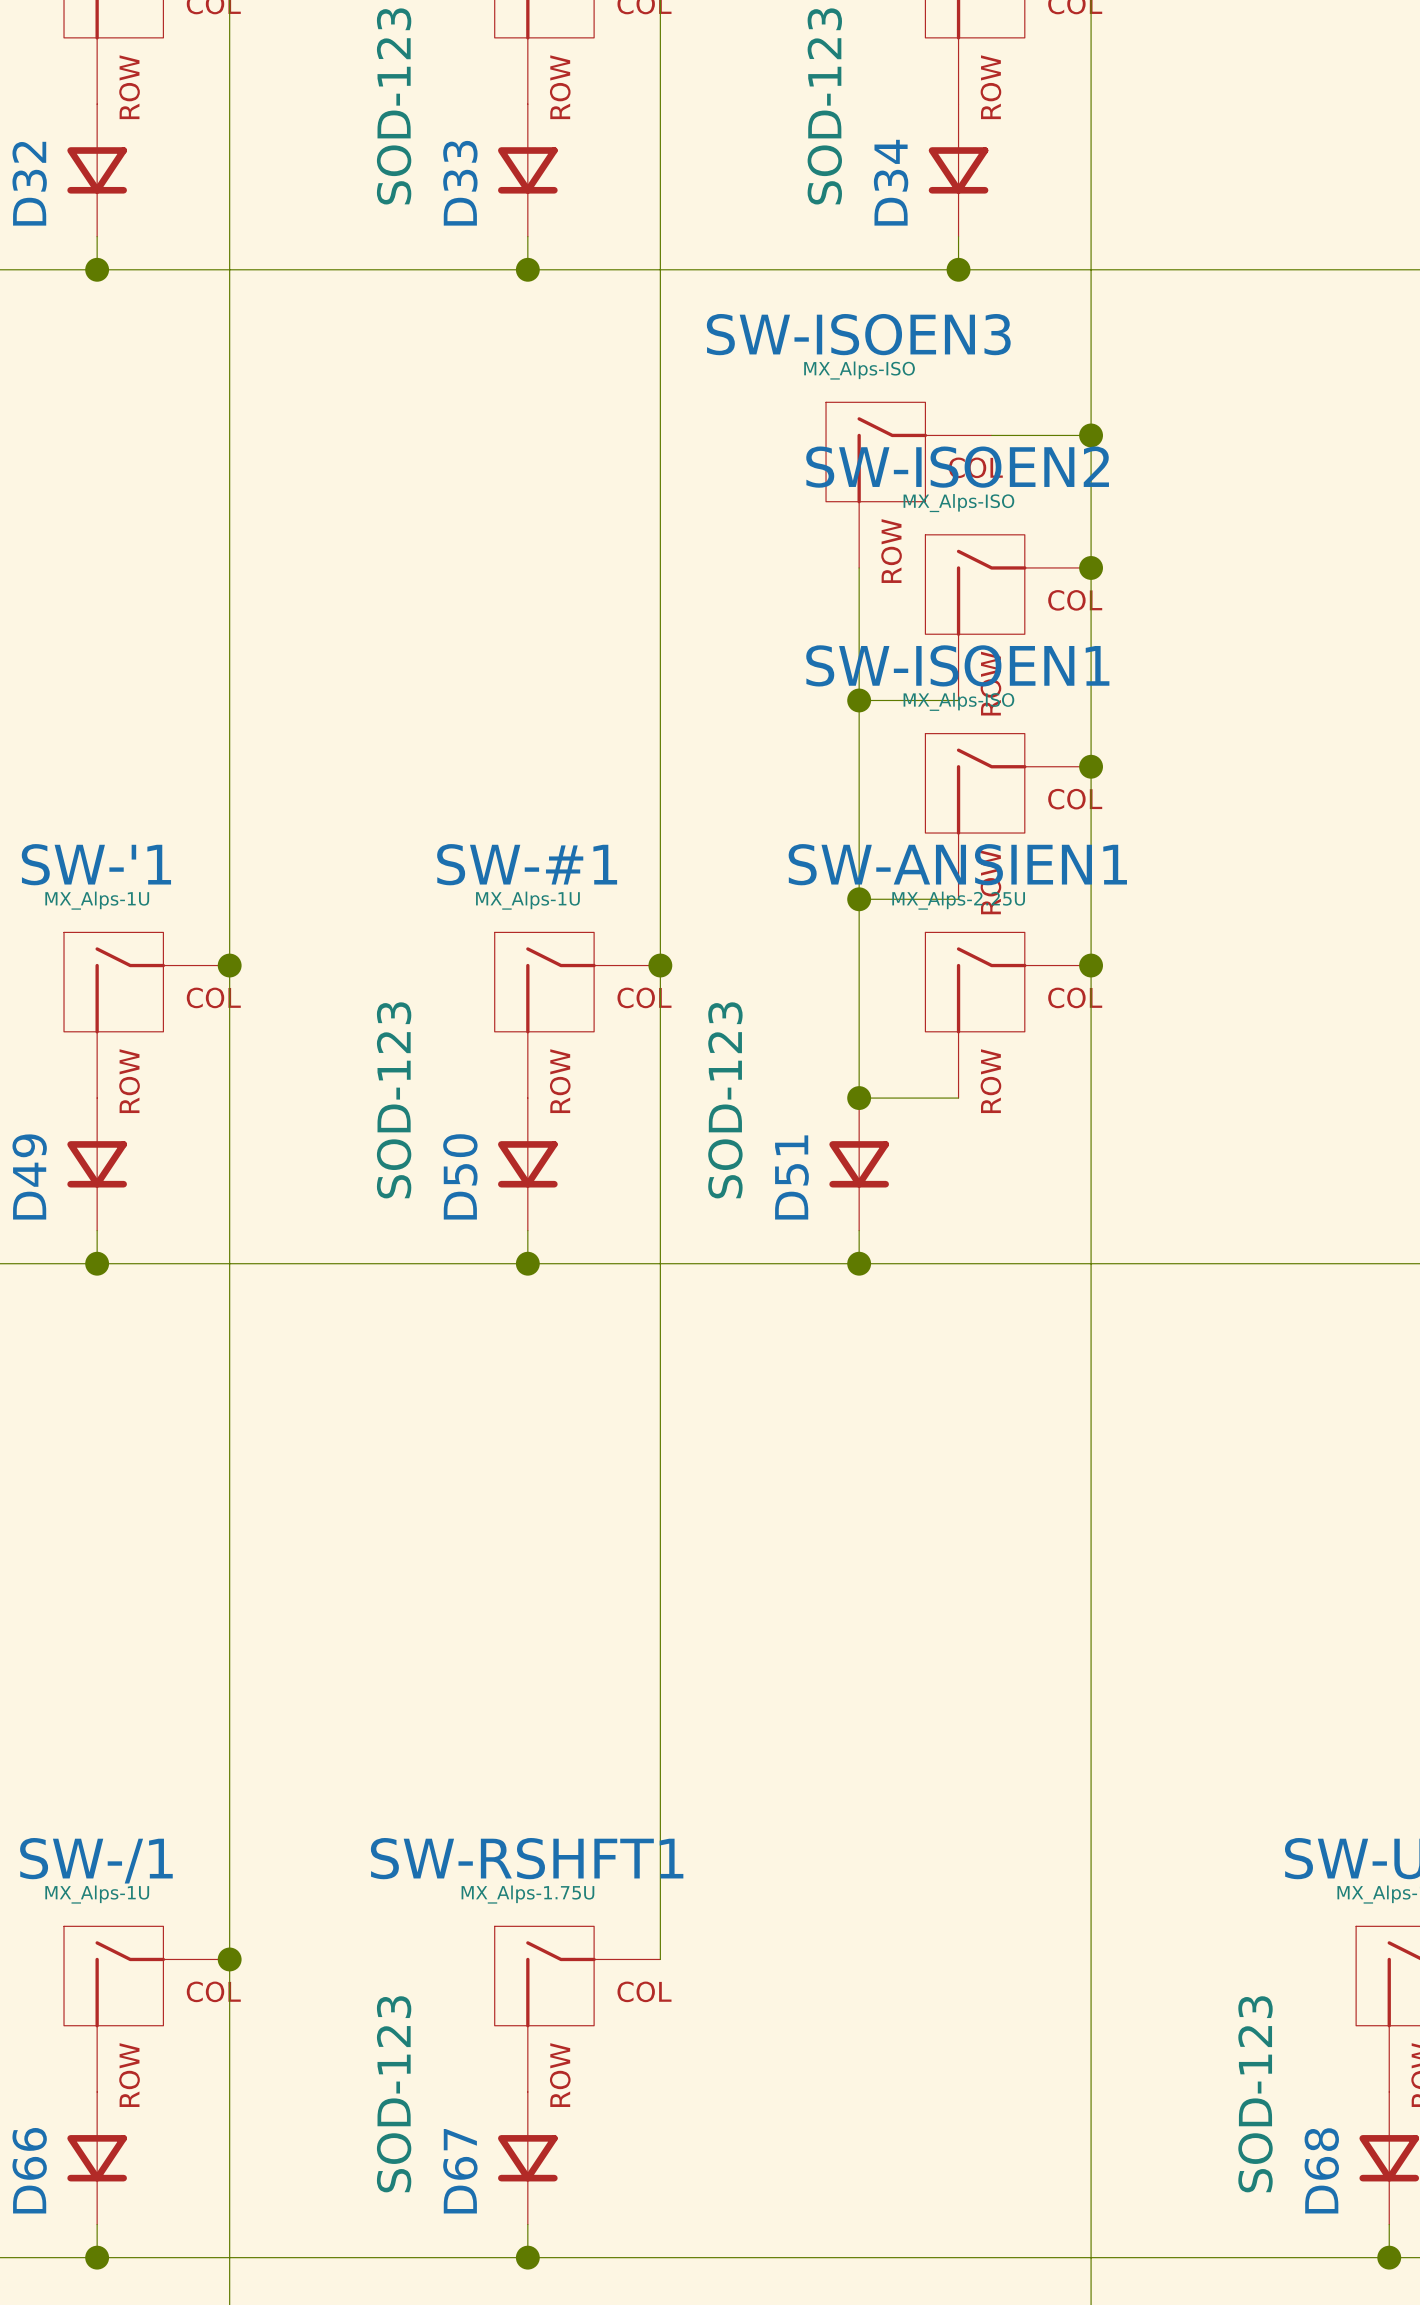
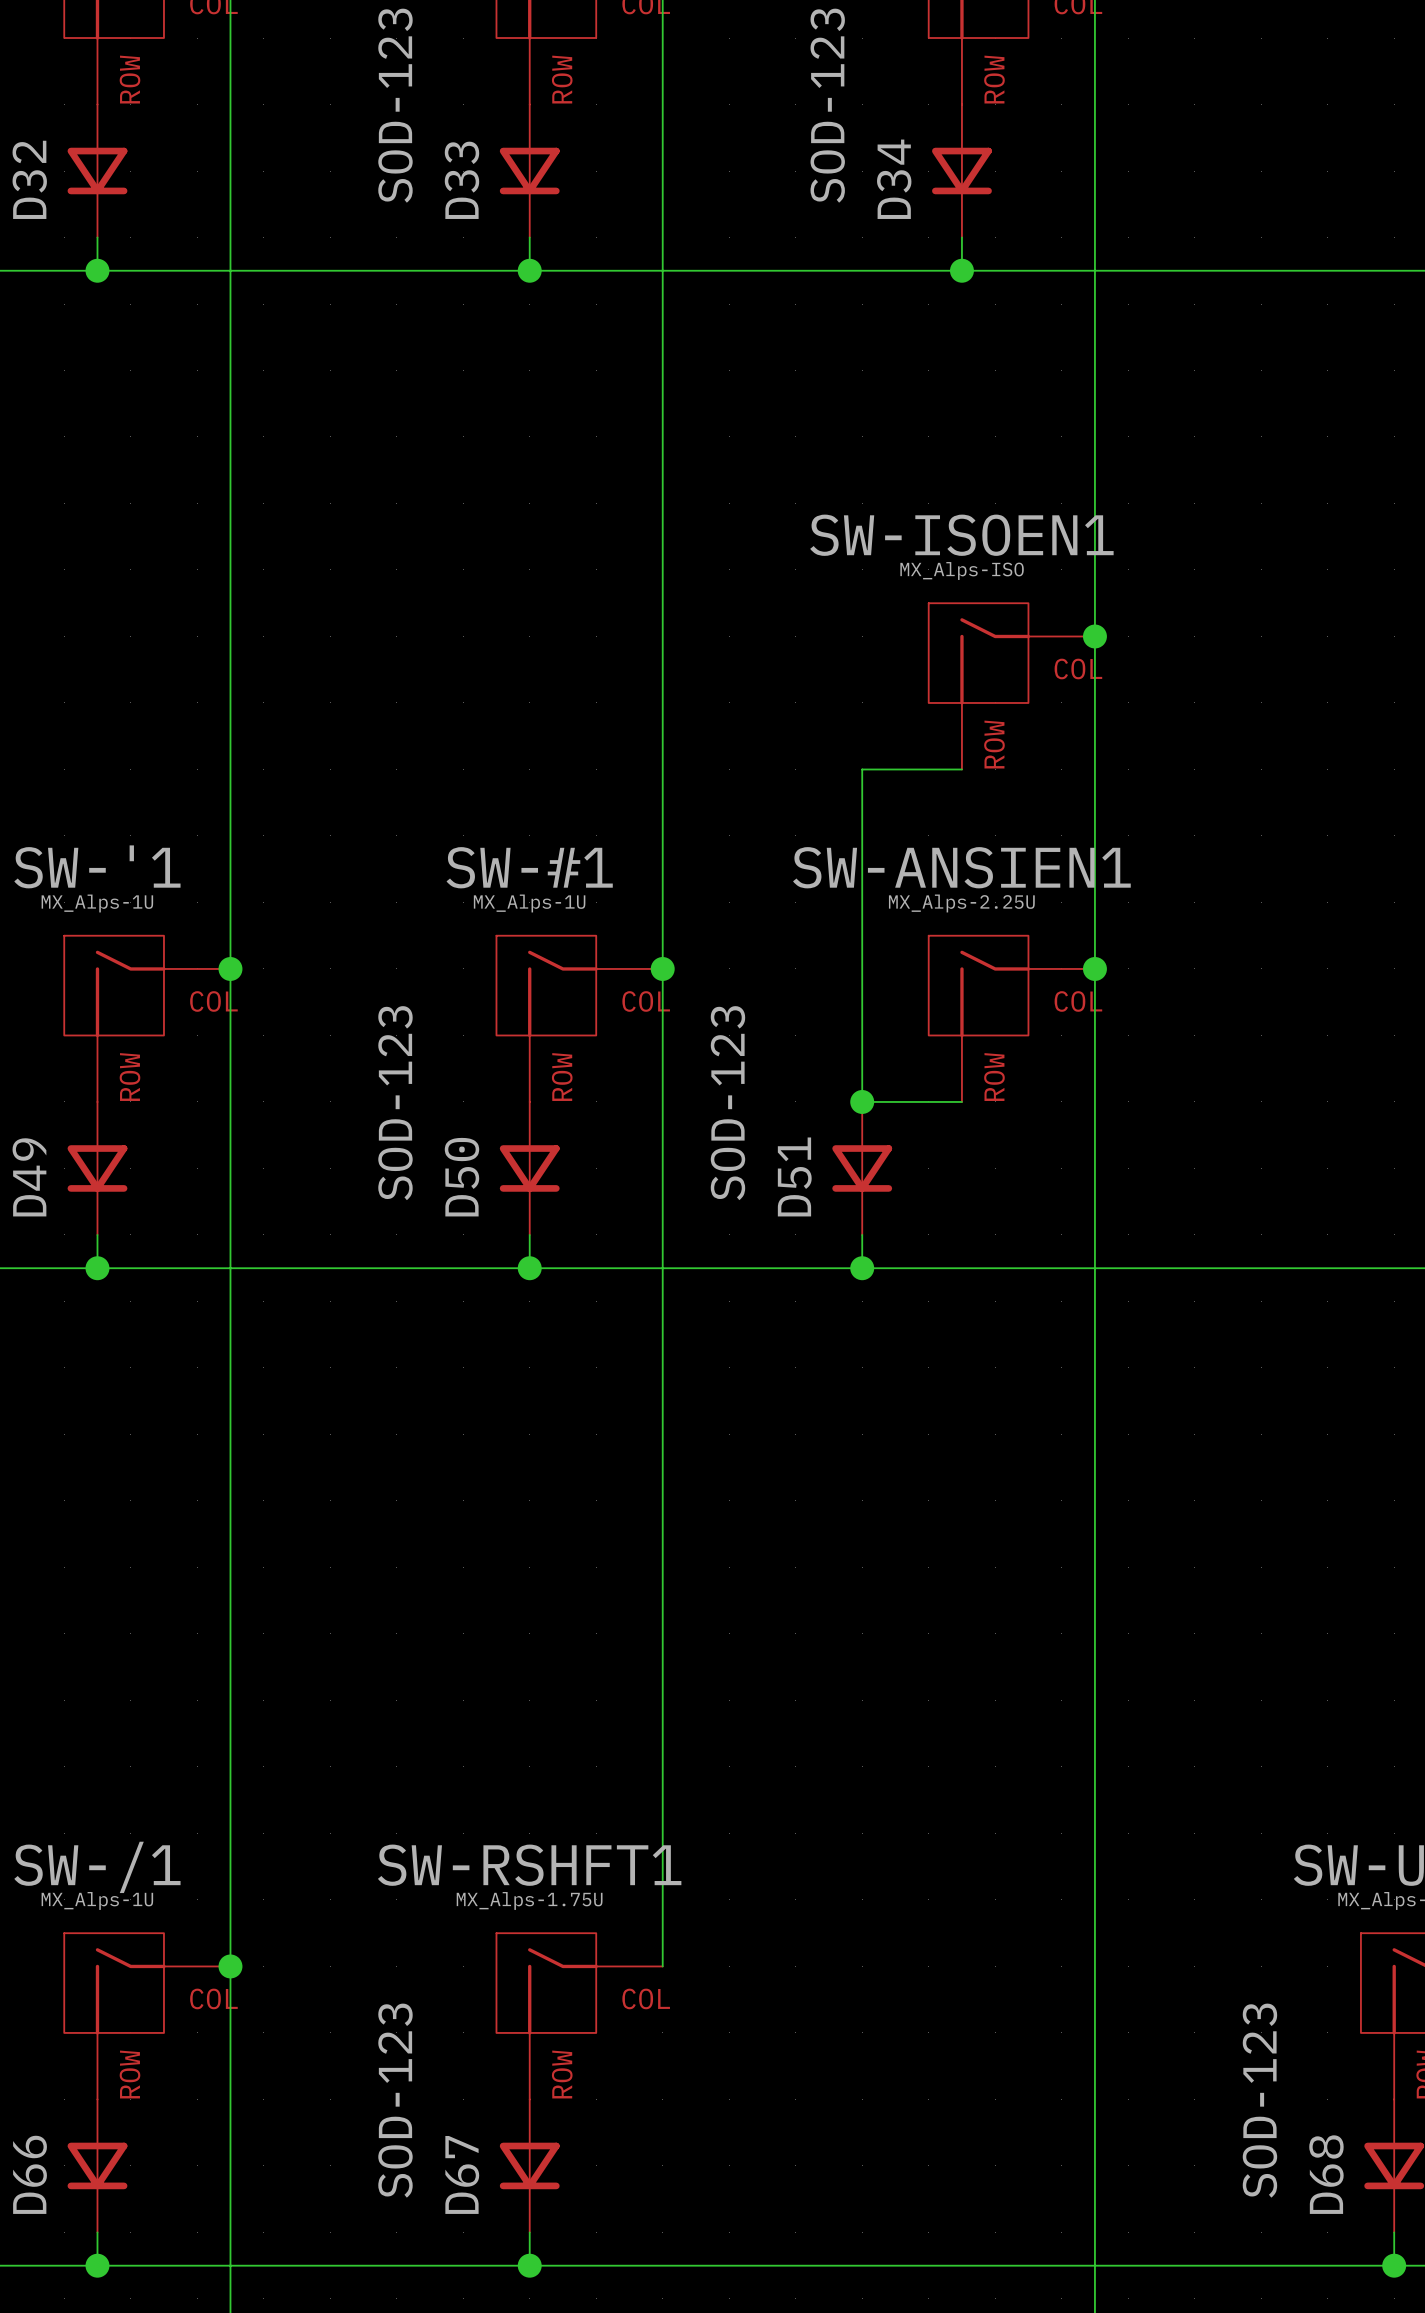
wire: (991, 435) (1091, 435) -> none
junction: (1091, 435) -> none
SW-ISOEN3: MX_Alps-ISO (908, 485) -> none
wire: (859, 567) (859, 766) -> (961, 769) (862, 769)
junction: (1091, 567) -> none
SW-ISOEN2: MX_Alps-ISO (1008, 617) -> none
junction: none -> (1094, 636)
wire: (859, 700) (958, 700) -> none
junction: (859, 700) -> none
junction: (1091, 766) -> none
SW-ISOEN1 position: (1008, 816) -> (1011, 686)
wire: (859, 899) (958, 899) -> none
junction: (859, 899) -> none

